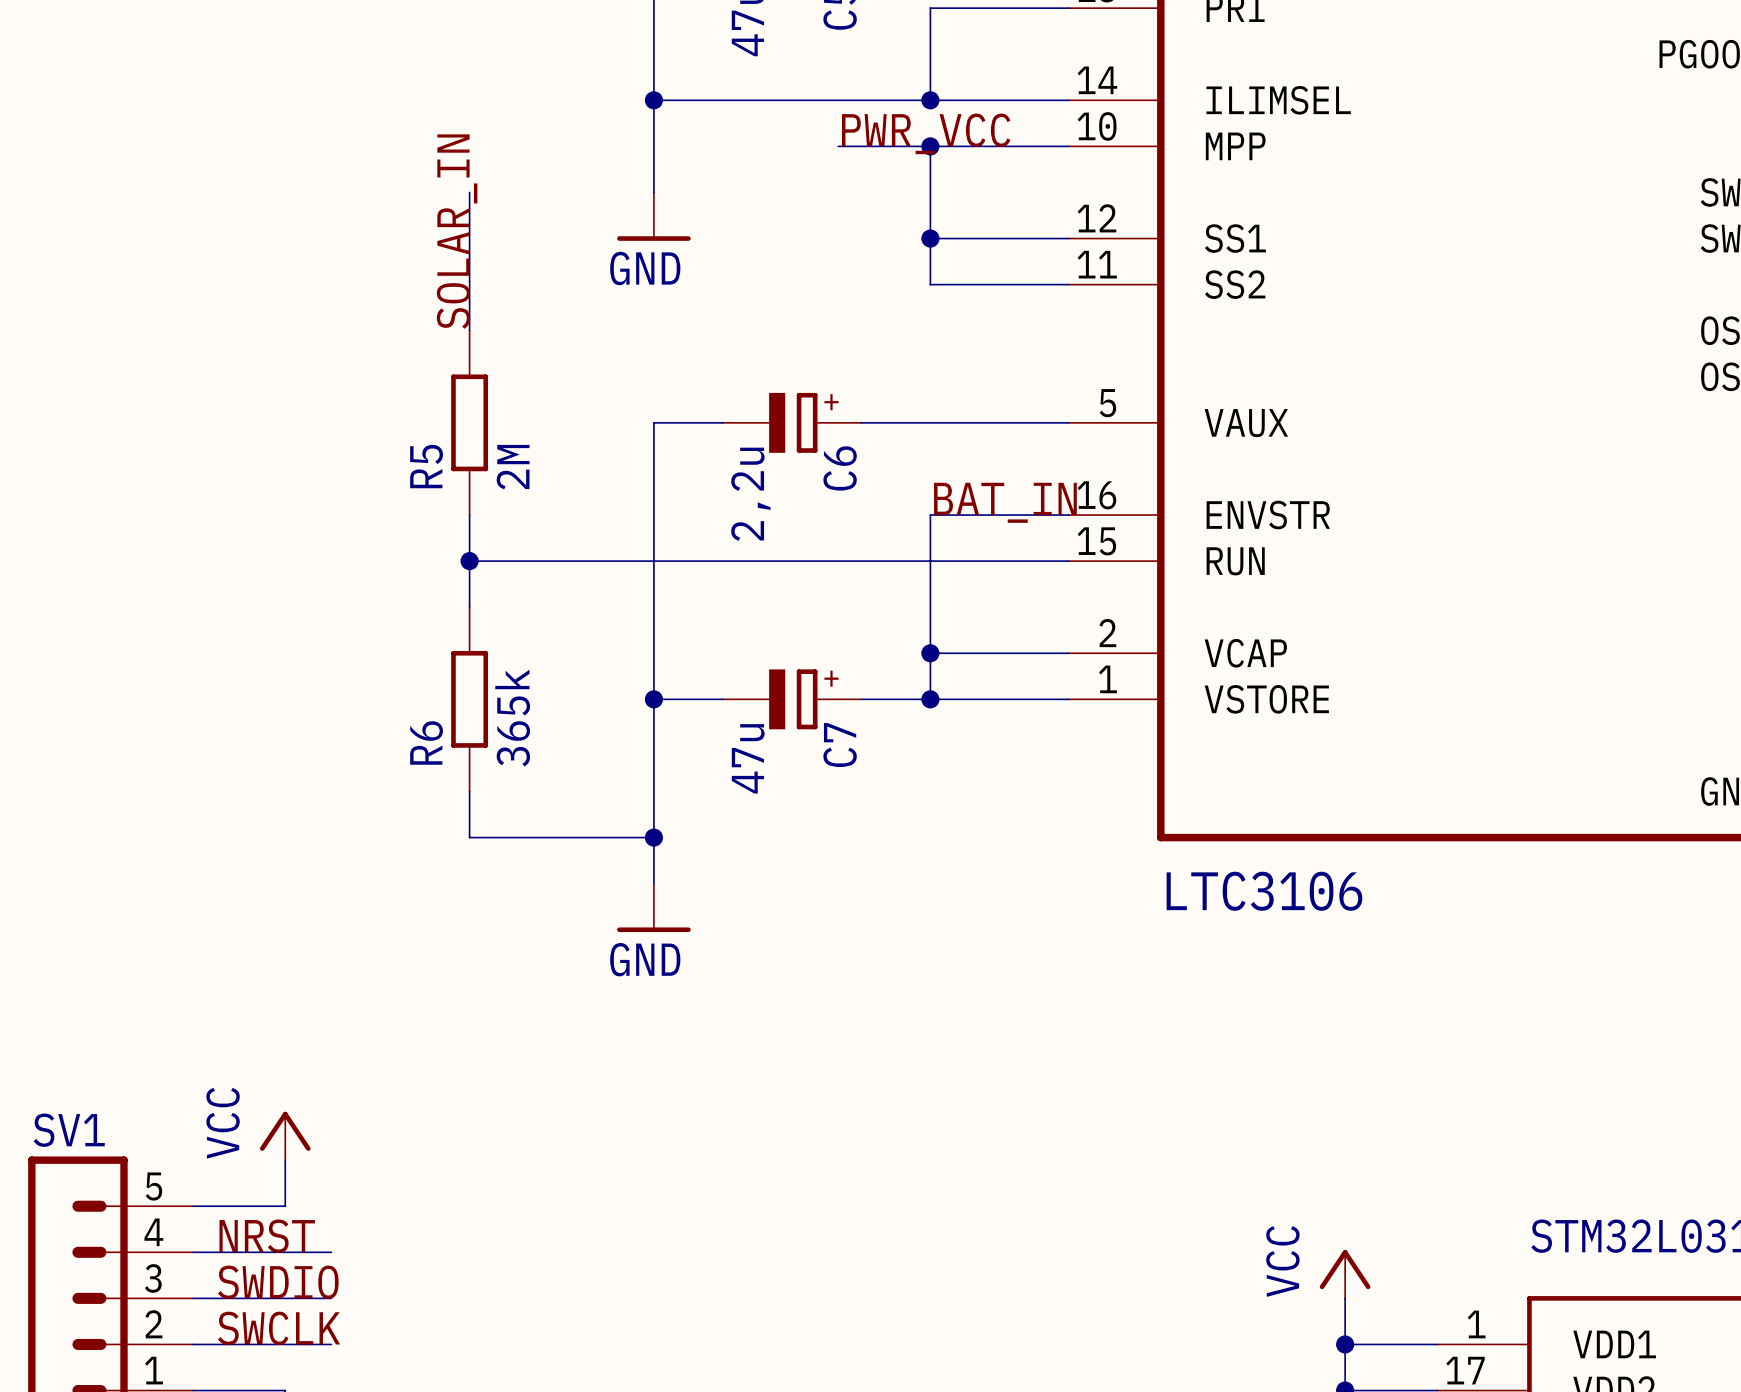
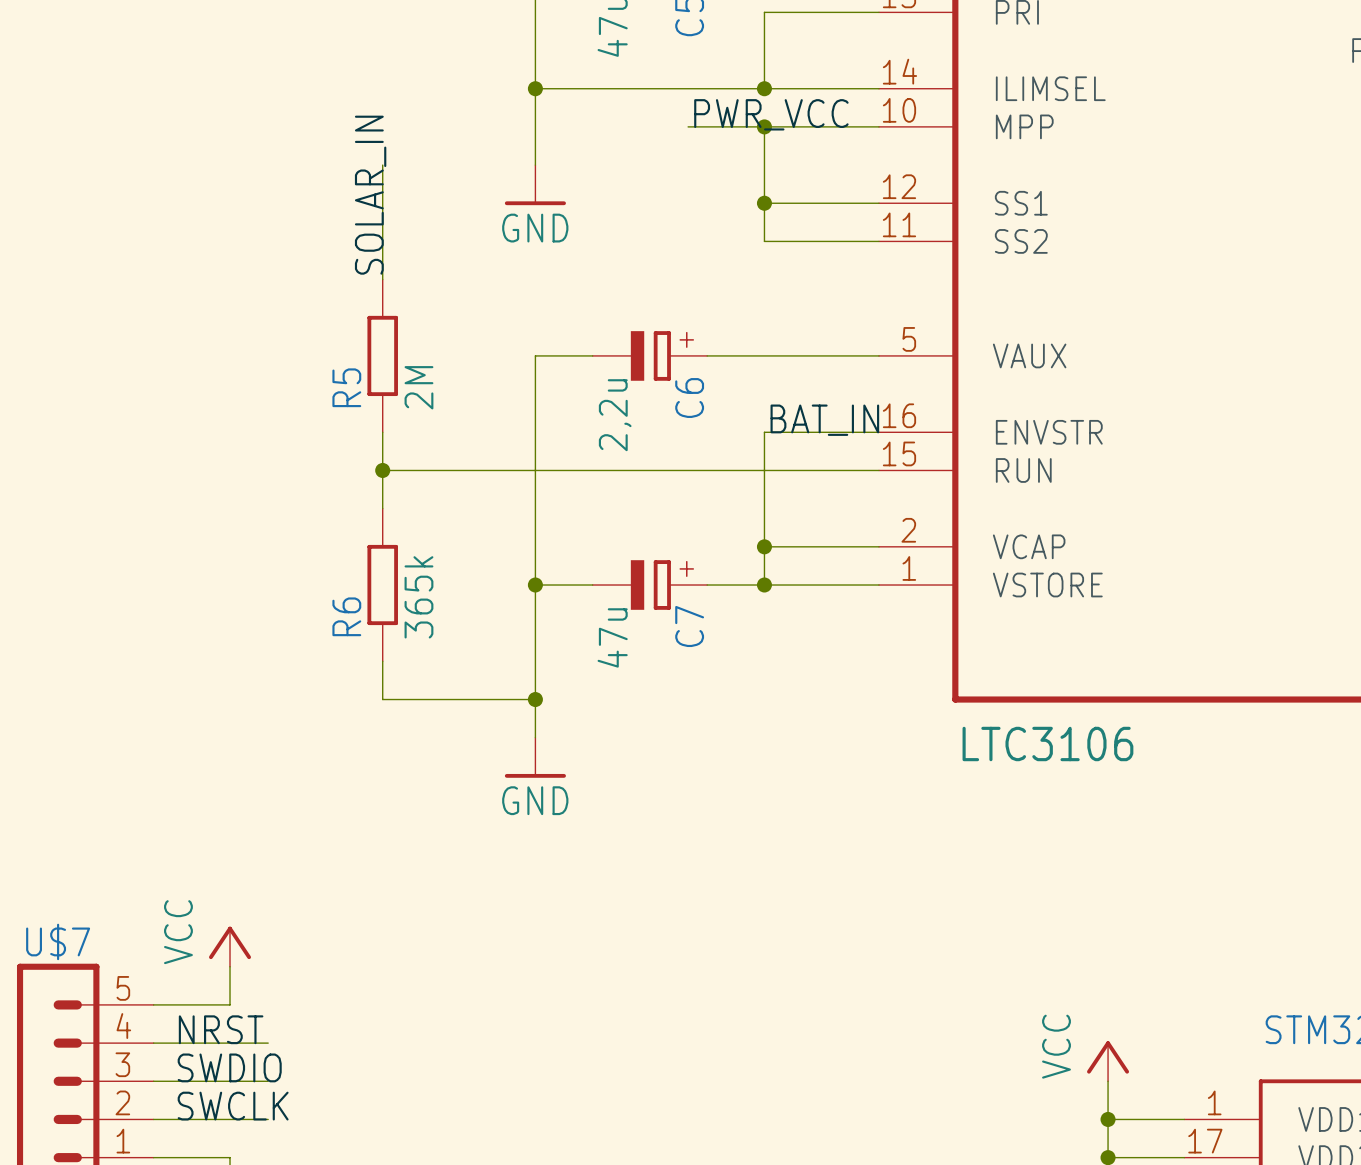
SV1 name: SV1 (69, 1130) -> U$7 (58, 941)

